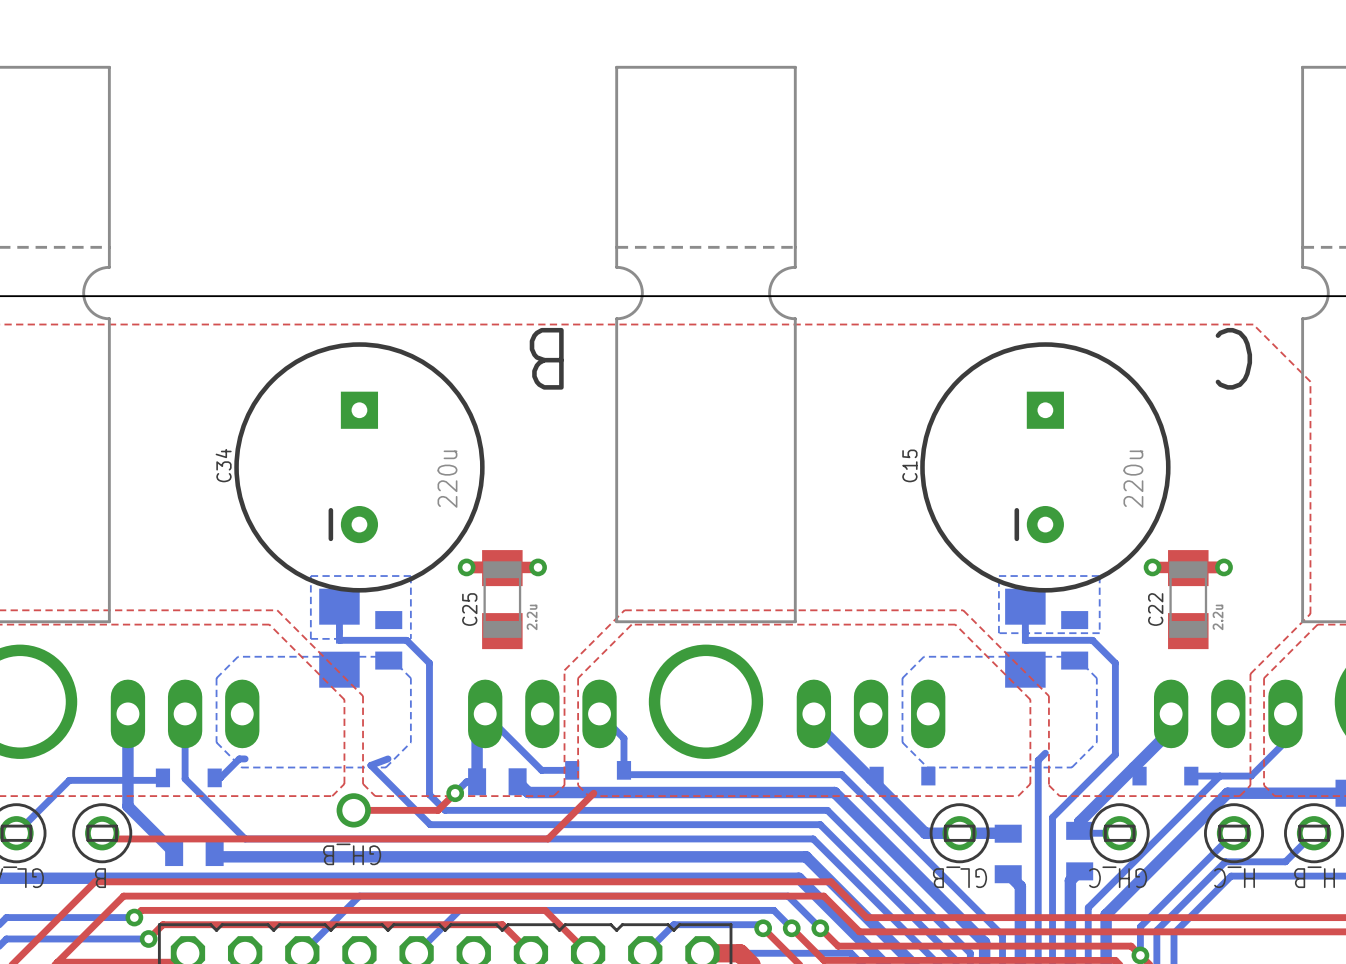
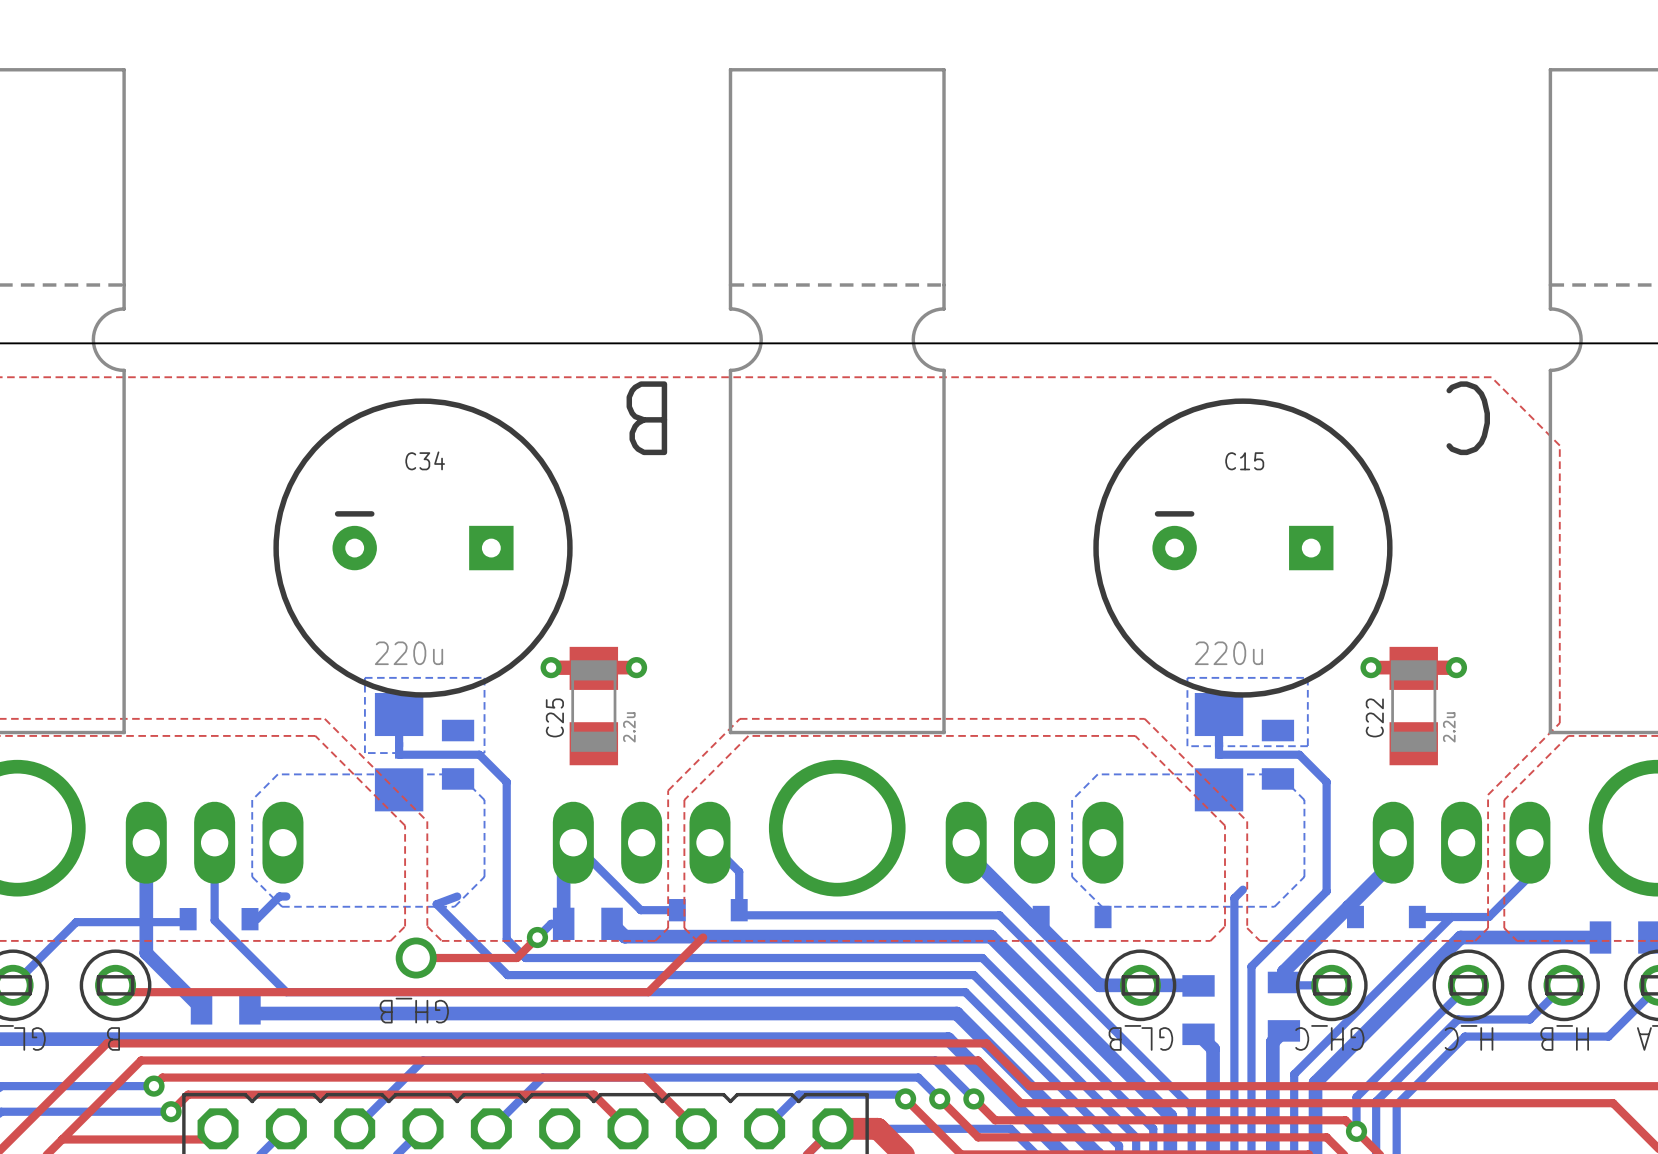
C34 name position: C34 (223, 465) -> C34 (425, 460)
C15 name position: C15 (909, 465) -> C15 (1244, 461)
C34 rotation: 0° (359, 467) -> 90° clockwise (423, 548)
C15 rotation: 0° (1045, 467) -> 90° clockwise (1242, 548)

